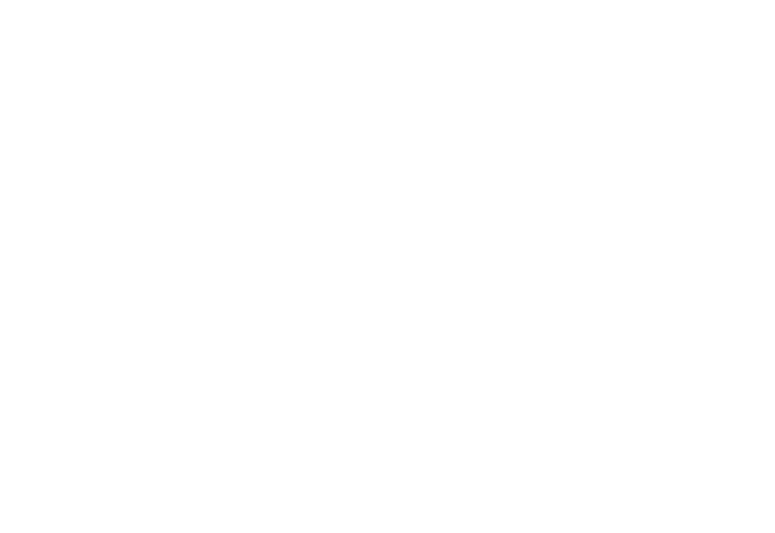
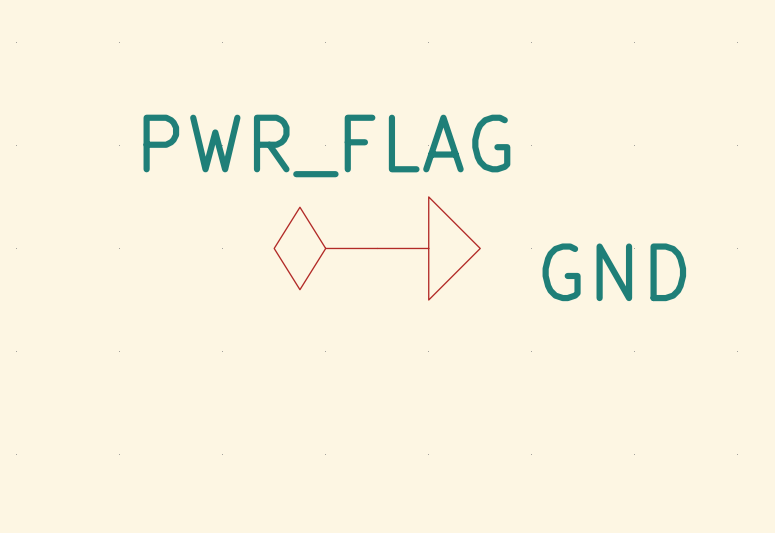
power symbol: none -> PWR_FLAG (325, 248)
power symbol: none -> GND (428, 248)

